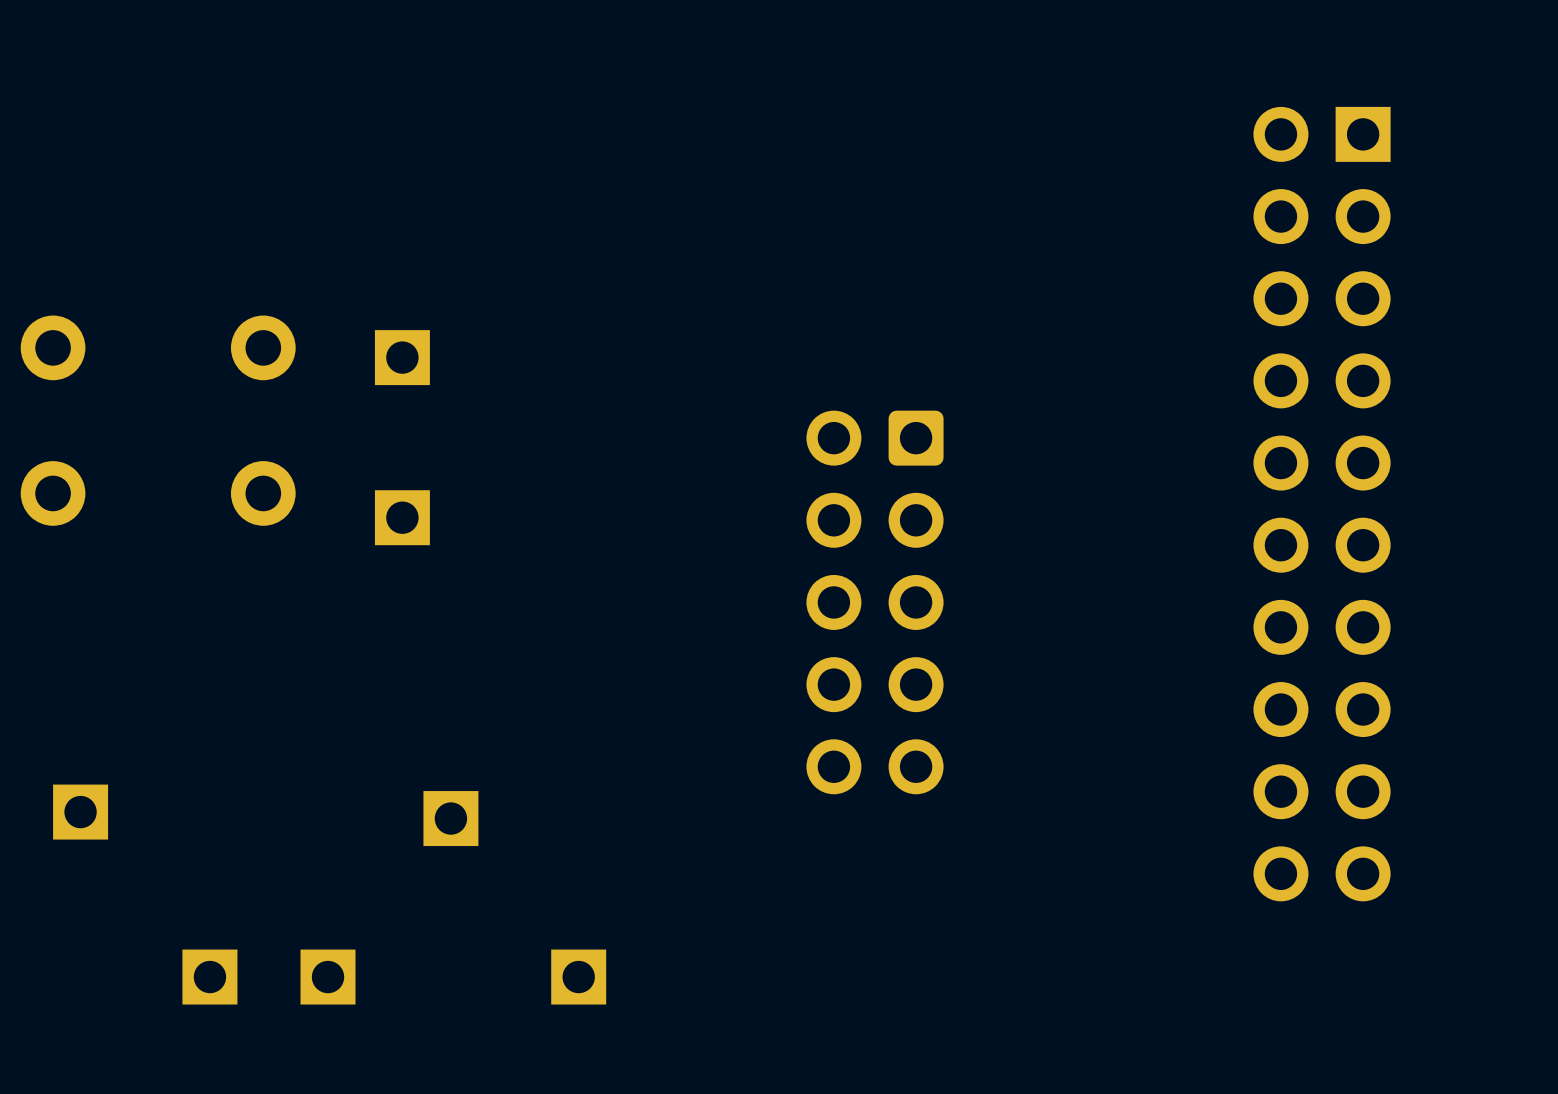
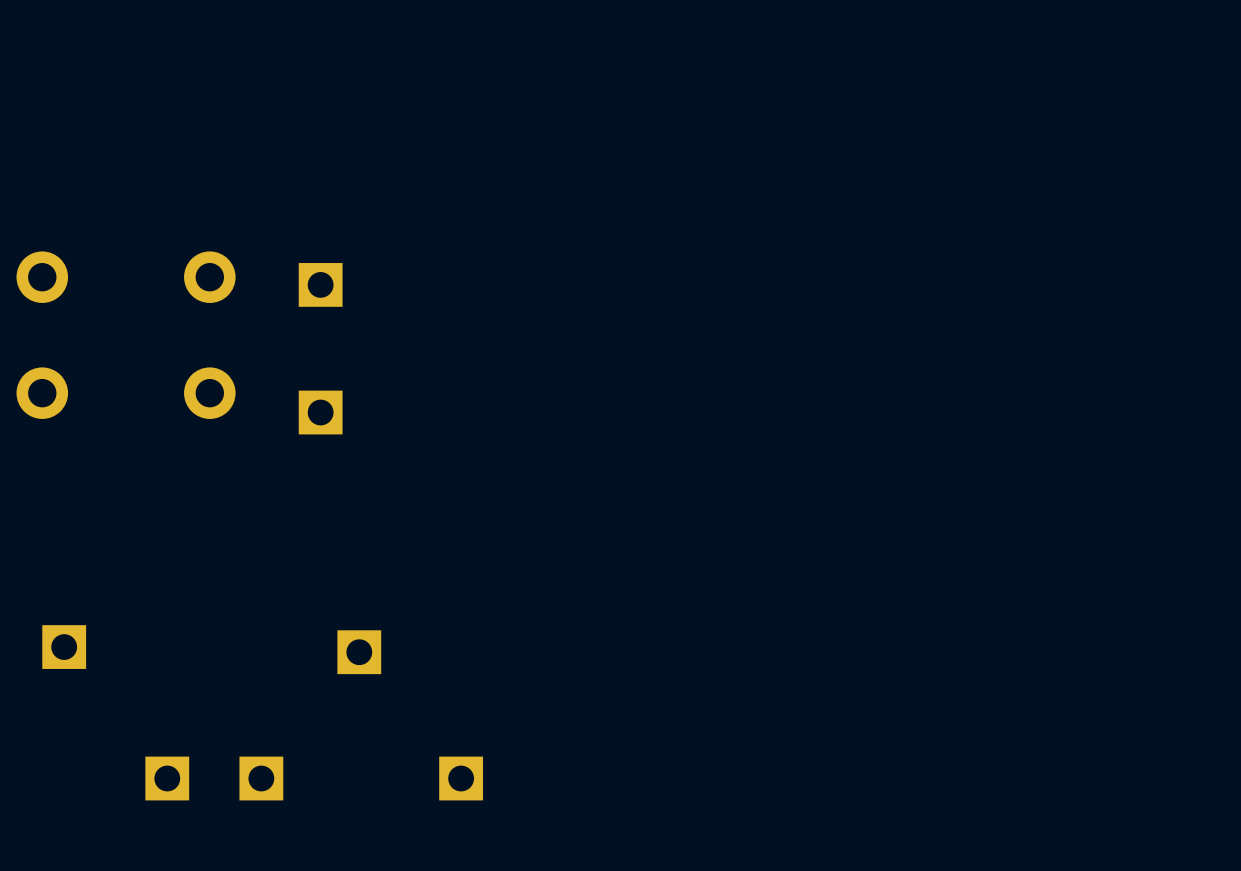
part: (1322, 504) -> none
part: (875, 602) -> none

